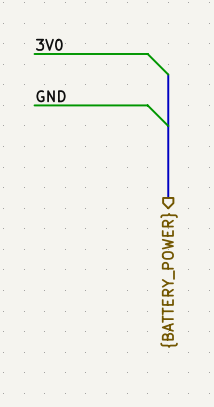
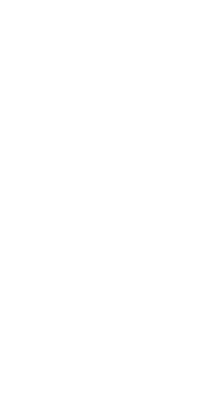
label: 3V0 (49, 44) -> none
wire: (34, 53) (147, 53) (168, 74) -> none
bus: (168, 74) (168, 197) -> none
label: GND (51, 96) -> none
wire: (34, 105) (147, 105) (168, 125) -> none
hierarchical label: {BATTERY_POWER} (169, 280) -> none

